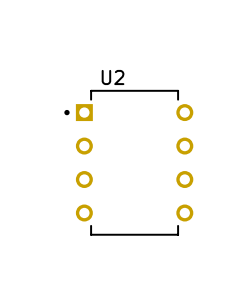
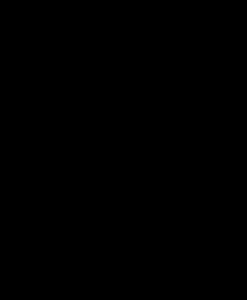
U2: (128, 162) -> none

